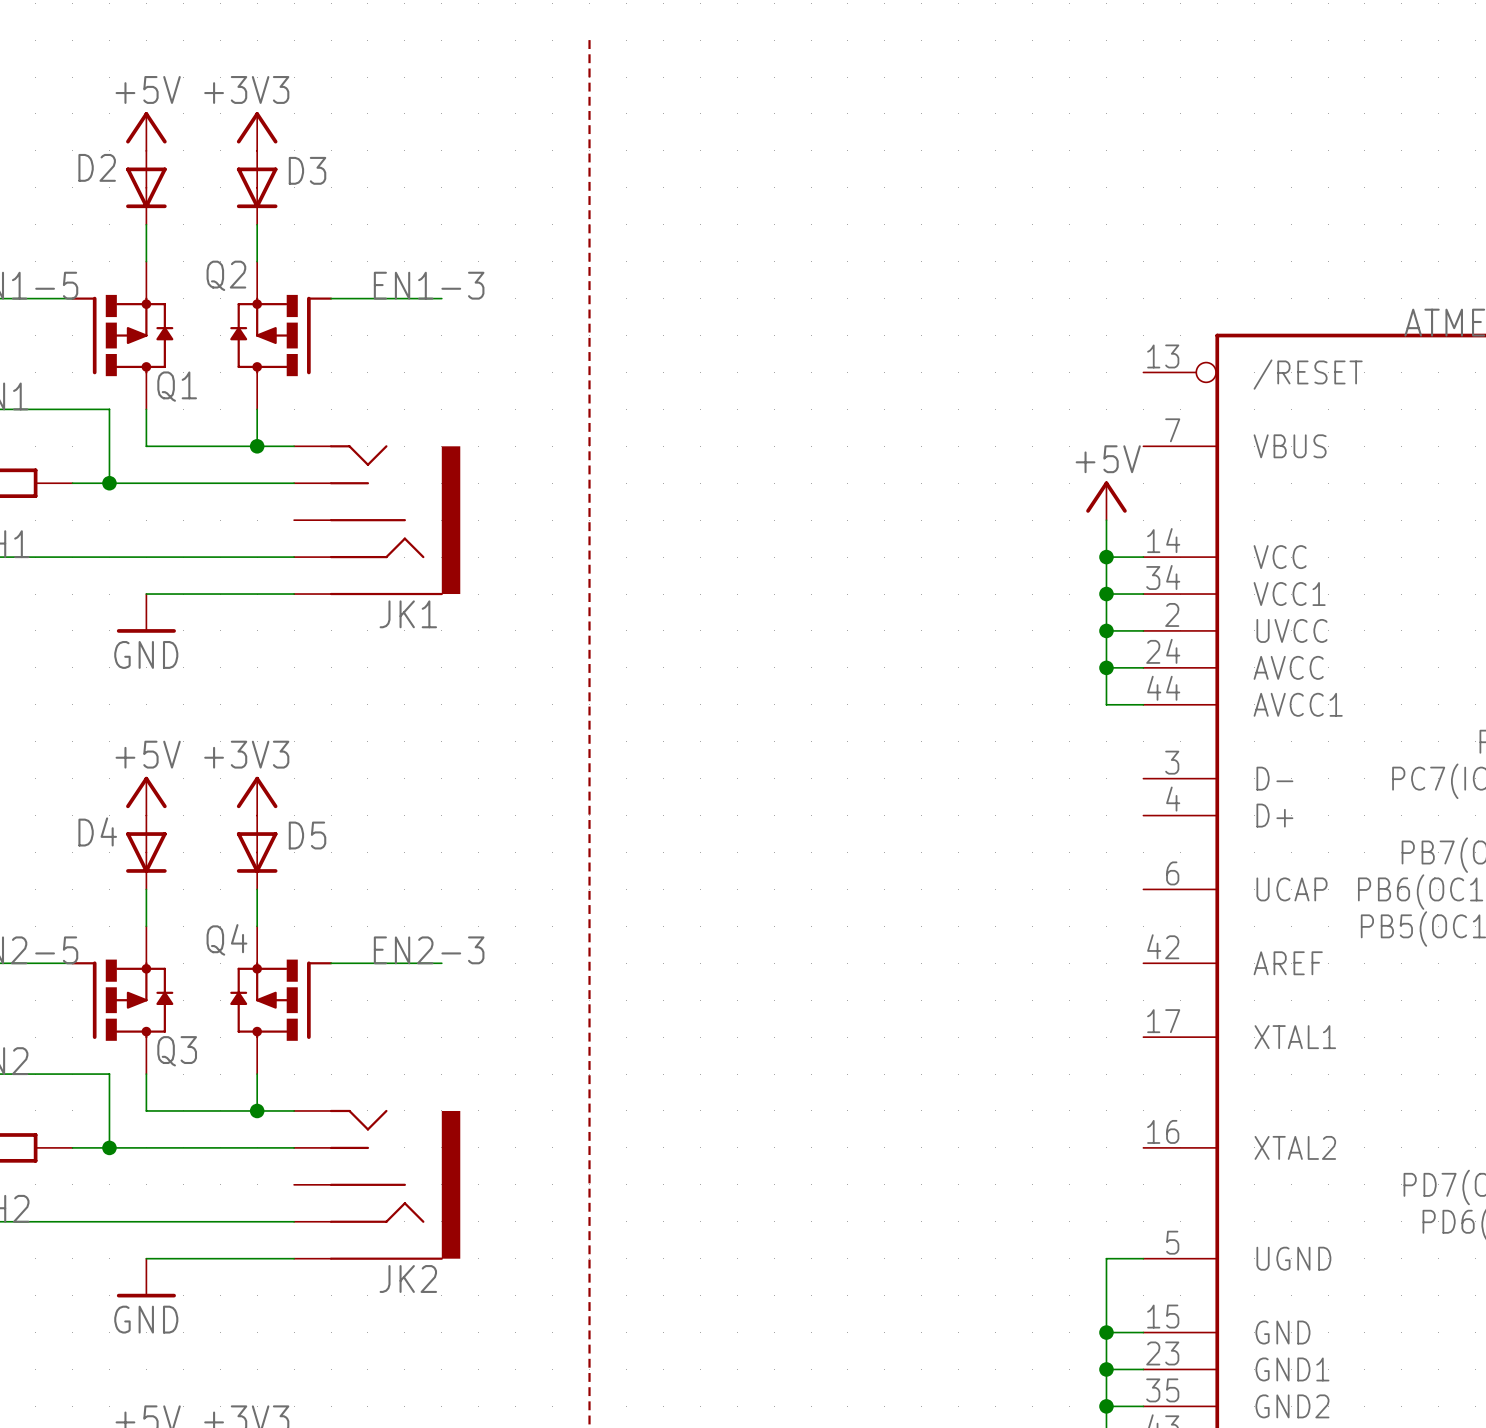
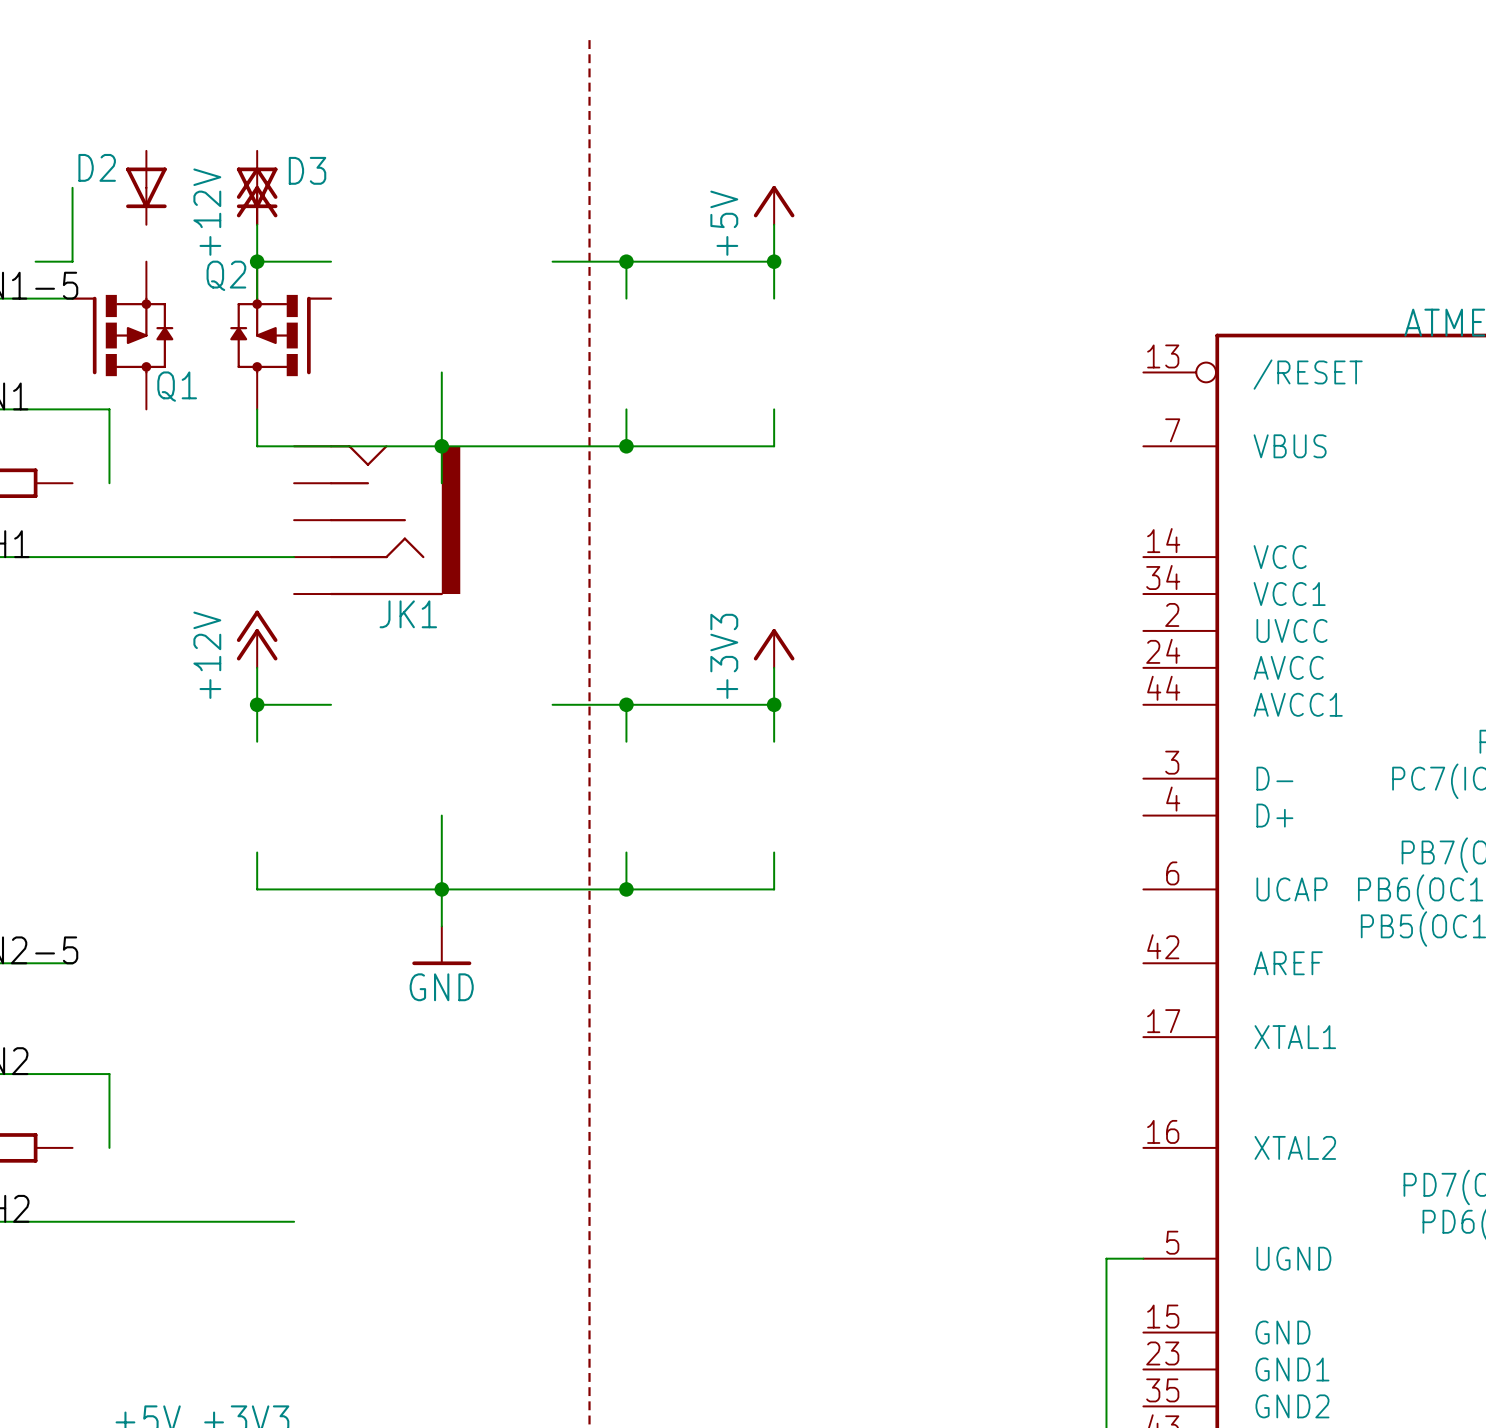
power symbol: +5V (146, 131) -> none
power symbol: +3V3 (257, 131) -> none
wire: none -> (72, 187) (72, 261) (35, 261)
power symbol: none -> +12V (257, 196)
power symbol: none -> +5V (774, 205)
wire: (146, 224) (146, 261) -> none
wire: none -> (774, 224) (774, 298)
junction: none -> (257, 261)
wire: none -> (331, 261) (257, 261) (257, 298)
wire: none -> (552, 261) (774, 261)
wire: none -> (626, 261) (626, 298)
junction: none -> (626, 261)
junction: none -> (774, 261)
label: EN1-3 (429, 285) -> none
wire: (331, 298) (441, 298) -> none
wire: none -> (441, 372) (441, 483)
wire: (146, 409) (146, 446) (257, 446) -> none
wire: none -> (626, 409) (626, 446)
wire: none -> (774, 409) (774, 446) (294, 446)
junction: (257, 446) -> none
junction: none -> (441, 446)
junction: none -> (626, 446)
wire: (72, 483) (294, 483) -> none
junction: (109, 483) -> none
power symbol: +5V (1106, 500) -> none
wire: (1106, 520) (1106, 704) (1143, 704) -> none
wire: (1106, 557) (1143, 557) -> none
junction: (1106, 557) -> none
wire: (146, 594) (294, 594) -> none
wire: (1106, 594) (1143, 594) -> none
junction: (1106, 594) -> none
power symbol: GND (146, 613) -> none
wire: (1106, 630) (1143, 630) -> none
junction: (1106, 630) -> none
power symbol: none -> +12V (257, 639)
power symbol: none -> +3V3 (774, 648)
wire: none -> (257, 667) (257, 741)
wire: none -> (774, 667) (774, 741)
wire: (1106, 667) (1143, 667) -> none
junction: (1106, 667) -> none
wire: none -> (257, 704) (331, 704)
junction: none -> (257, 704)
wire: none -> (552, 704) (774, 704)
wire: none -> (626, 704) (626, 741)
junction: none -> (626, 704)
junction: none -> (774, 704)
power symbol: +5V (146, 796) -> none
power symbol: +3V3 (257, 796) -> none
wire: none -> (441, 815) (441, 926)
D4: (146, 852) -> none
wire: none -> (257, 852) (257, 889) (774, 889) (774, 852)
D5: (257, 852) -> none
wire: none -> (626, 852) (626, 889)
wire: (146, 889) (146, 926) -> none
wire: (257, 889) (257, 926) -> none
junction: none -> (441, 889)
junction: none -> (626, 889)
power symbol: none -> GND (441, 945)
label: EN2-3 (429, 950) -> none
wire: (331, 963) (441, 963) -> none
Q3: (122, 1000) -> none
Q4: (281, 1000) -> none
wire: (146, 1074) (146, 1110) (294, 1110) -> none
wire: (257, 1074) (257, 1110) -> none
junction: (257, 1110) -> none
wire: (72, 1147) (294, 1147) -> none
junction: (109, 1147) -> none
JK2: (377, 1184) -> none
wire: (146, 1258) (294, 1258) -> none
power symbol: GND (146, 1278) -> none
wire: (1106, 1332) (1143, 1332) -> none
junction: (1106, 1332) -> none
wire: (1106, 1369) (1143, 1369) -> none
junction: (1106, 1369) -> none
wire: (1106, 1406) (1143, 1406) -> none
junction: (1106, 1406) -> none

